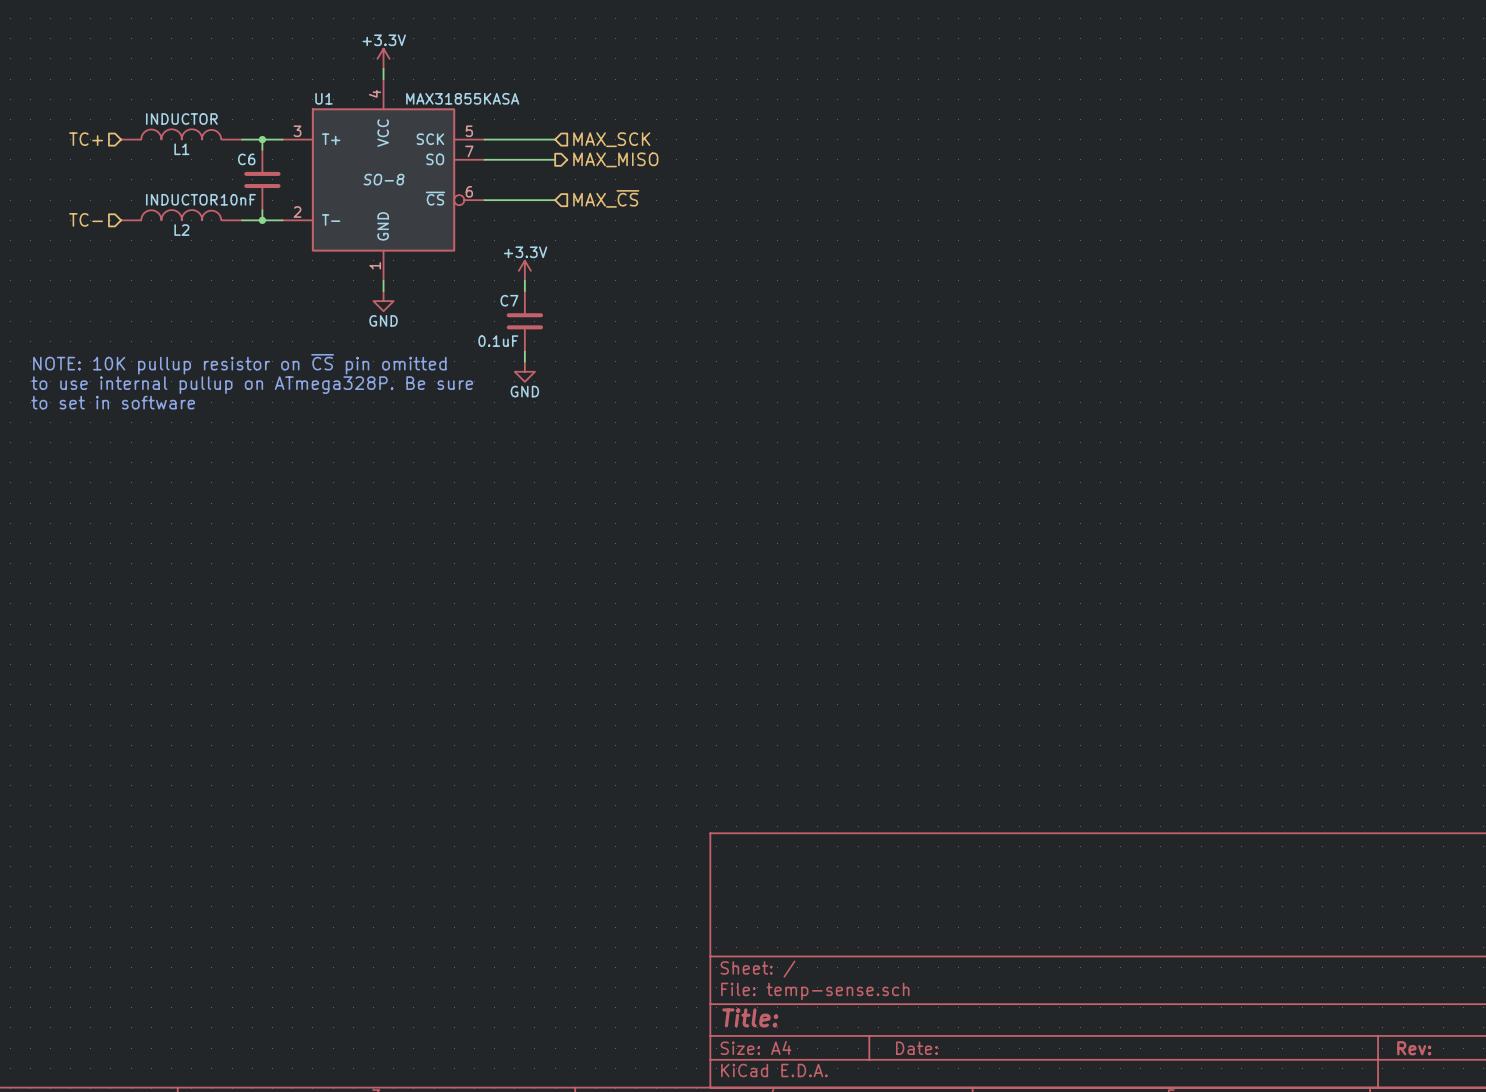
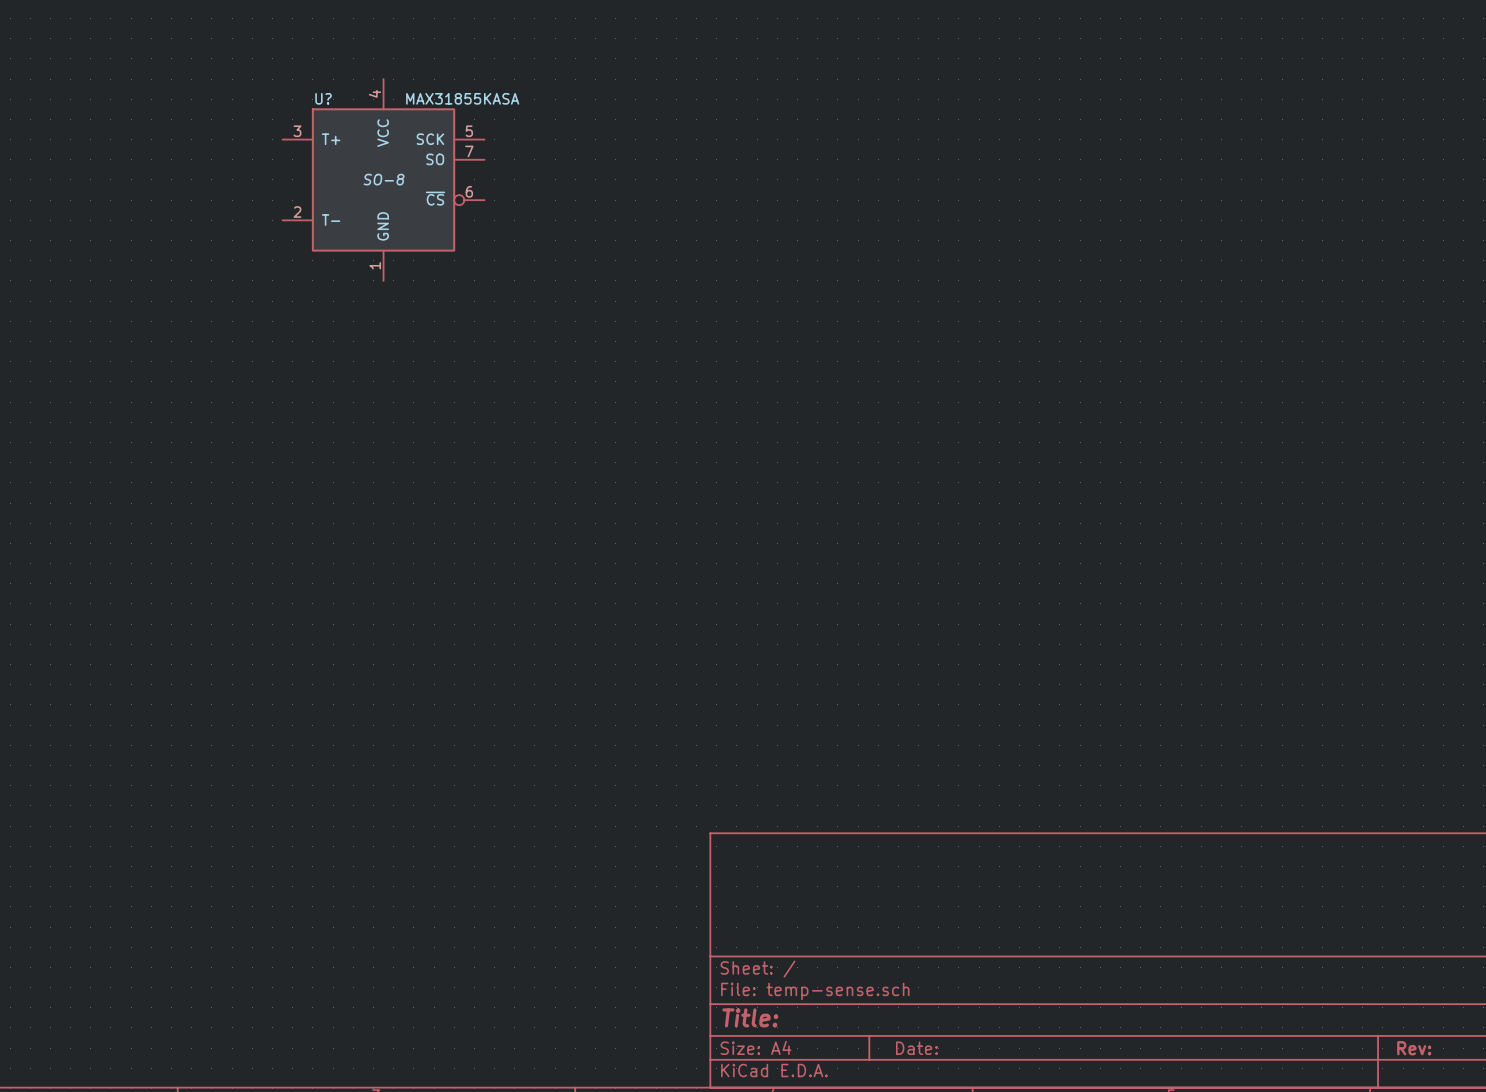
power symbol: +3.3V (383, 58) -> none
wire: (383, 68) (383, 79) -> none
U1 name: U1 (324, 98) -> U? (323, 98)
L1: INDUCTOR (181, 134) -> none
hierarchical label: TC+ (86, 139) -> none
wire: (242, 139) (282, 139) -> none
wire: (262, 139) (262, 149) -> none
junction: (262, 139) -> none
wire: (484, 139) (555, 139) -> none
hierarchical label: MAX_SCK (611, 139) -> none
wire: (484, 159) (555, 159) -> none
hierarchical label: MAX_MISO (615, 159) -> none
C6: 10nF (262, 179) -> none
hierarchical label: MAX_~{CS} (606, 198) -> none
wire: (484, 200) (555, 200) -> none
wire: (262, 210) (262, 220) -> none
L2: INDUCTOR (181, 215) -> none
hierarchical label: TC- (86, 219) -> none
wire: (242, 220) (282, 220) -> none
junction: (262, 220) -> none
power symbol: +3.3V (524, 270) -> none
wire: (383, 280) (383, 291) -> none
wire: (524, 280) (524, 291) -> none
power symbol: GND (383, 301) -> none
C7: 0.1uF (524, 321) -> none
wire: (524, 351) (524, 361) -> none
text: NOTE: 10K pullup resistor on ~{CS} pin omitted (239, 364) -> none
power symbol: GND (524, 371) -> none
text: to use internal pullup on ATmega328P. Be sure (252, 385) -> none
text: to set in software (113, 402) -> none

